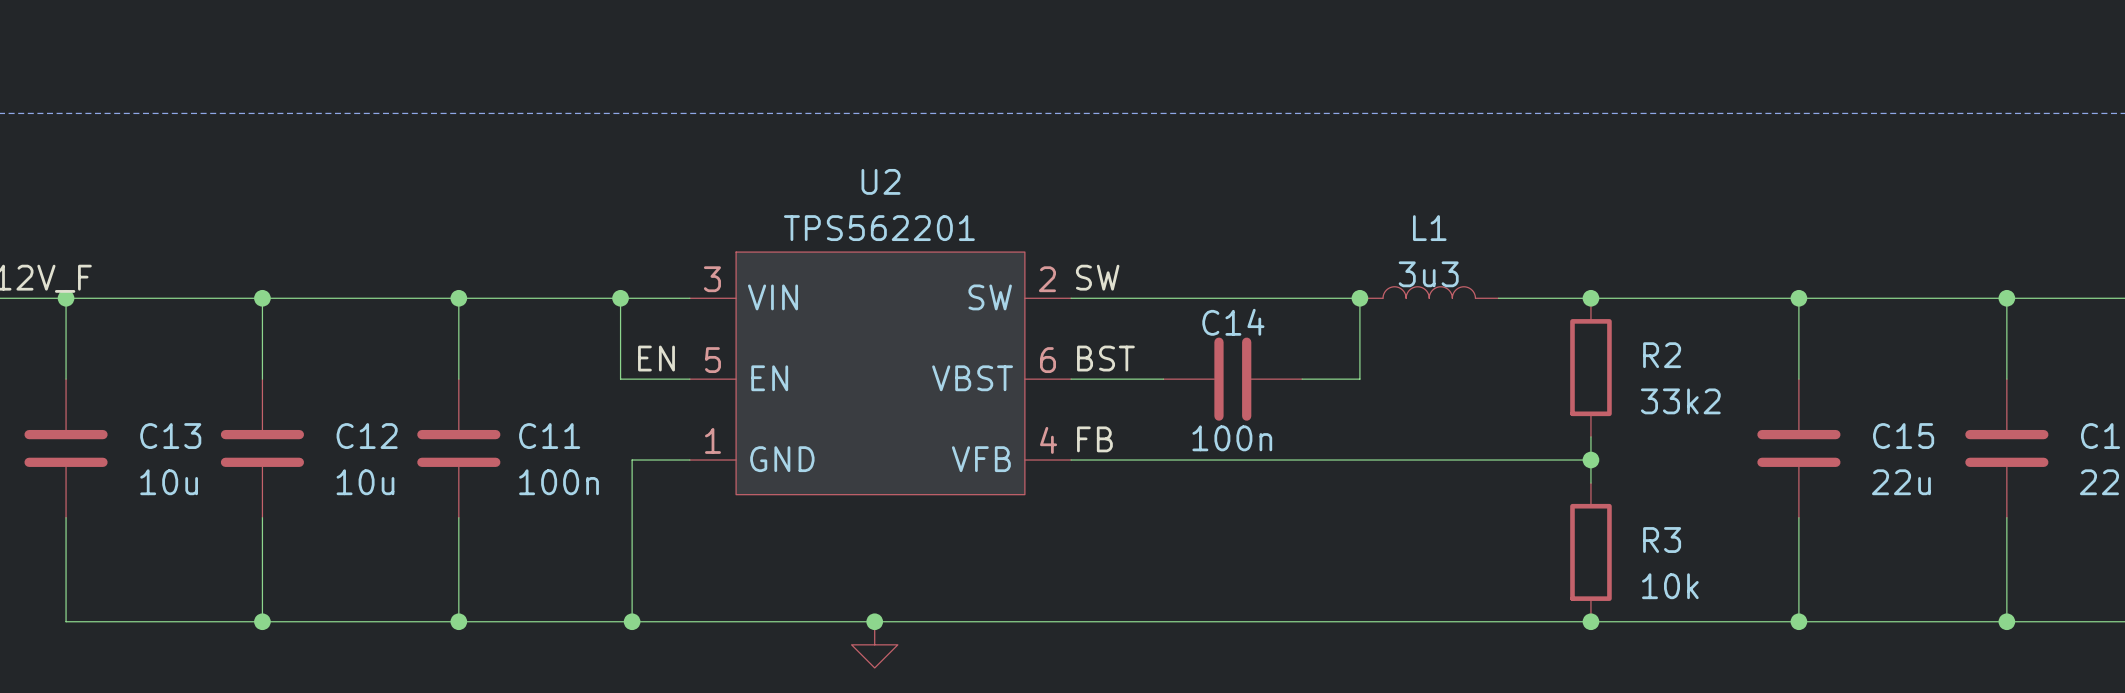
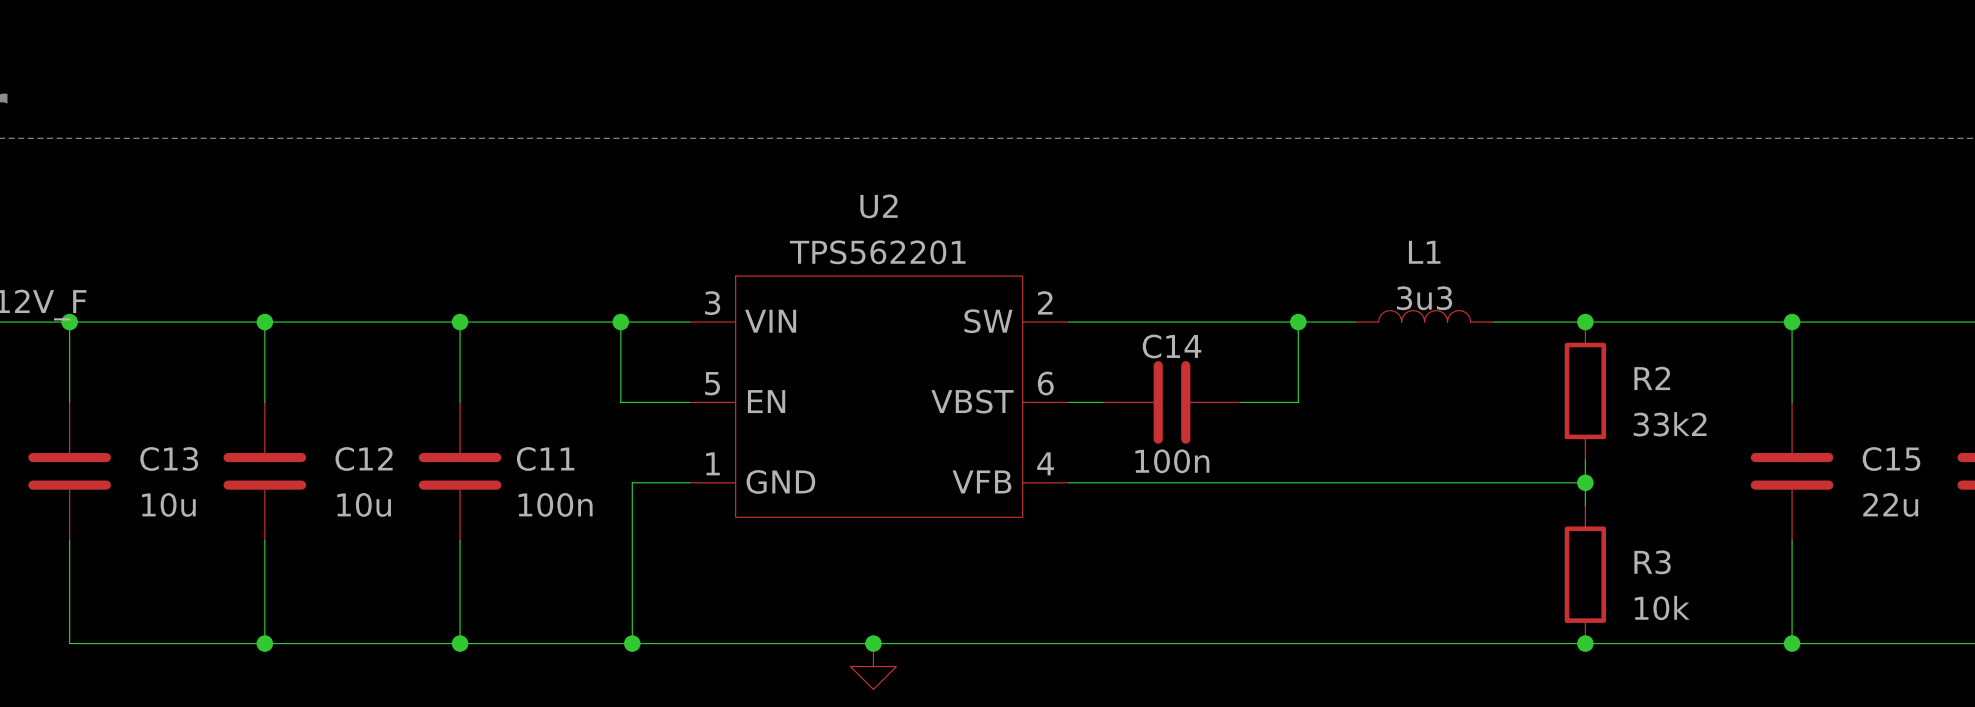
label: SW (1097, 277) -> none
wire: (1359, 298) (1359, 379) (1302, 379) -> (1298, 322) (1298, 402) (1240, 402)
junction position: (1359, 298) -> (1298, 322)
label: EN (656, 358) -> none
label: BST (1105, 358) -> none
C14 position: (1232, 379) -> (1171, 402)
label: FB (1094, 439) -> none

